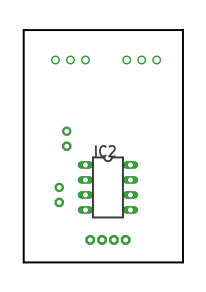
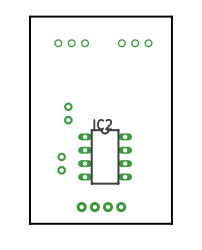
part footprint: [85, 234, 131, 245] -> [76, 201, 127, 213]

